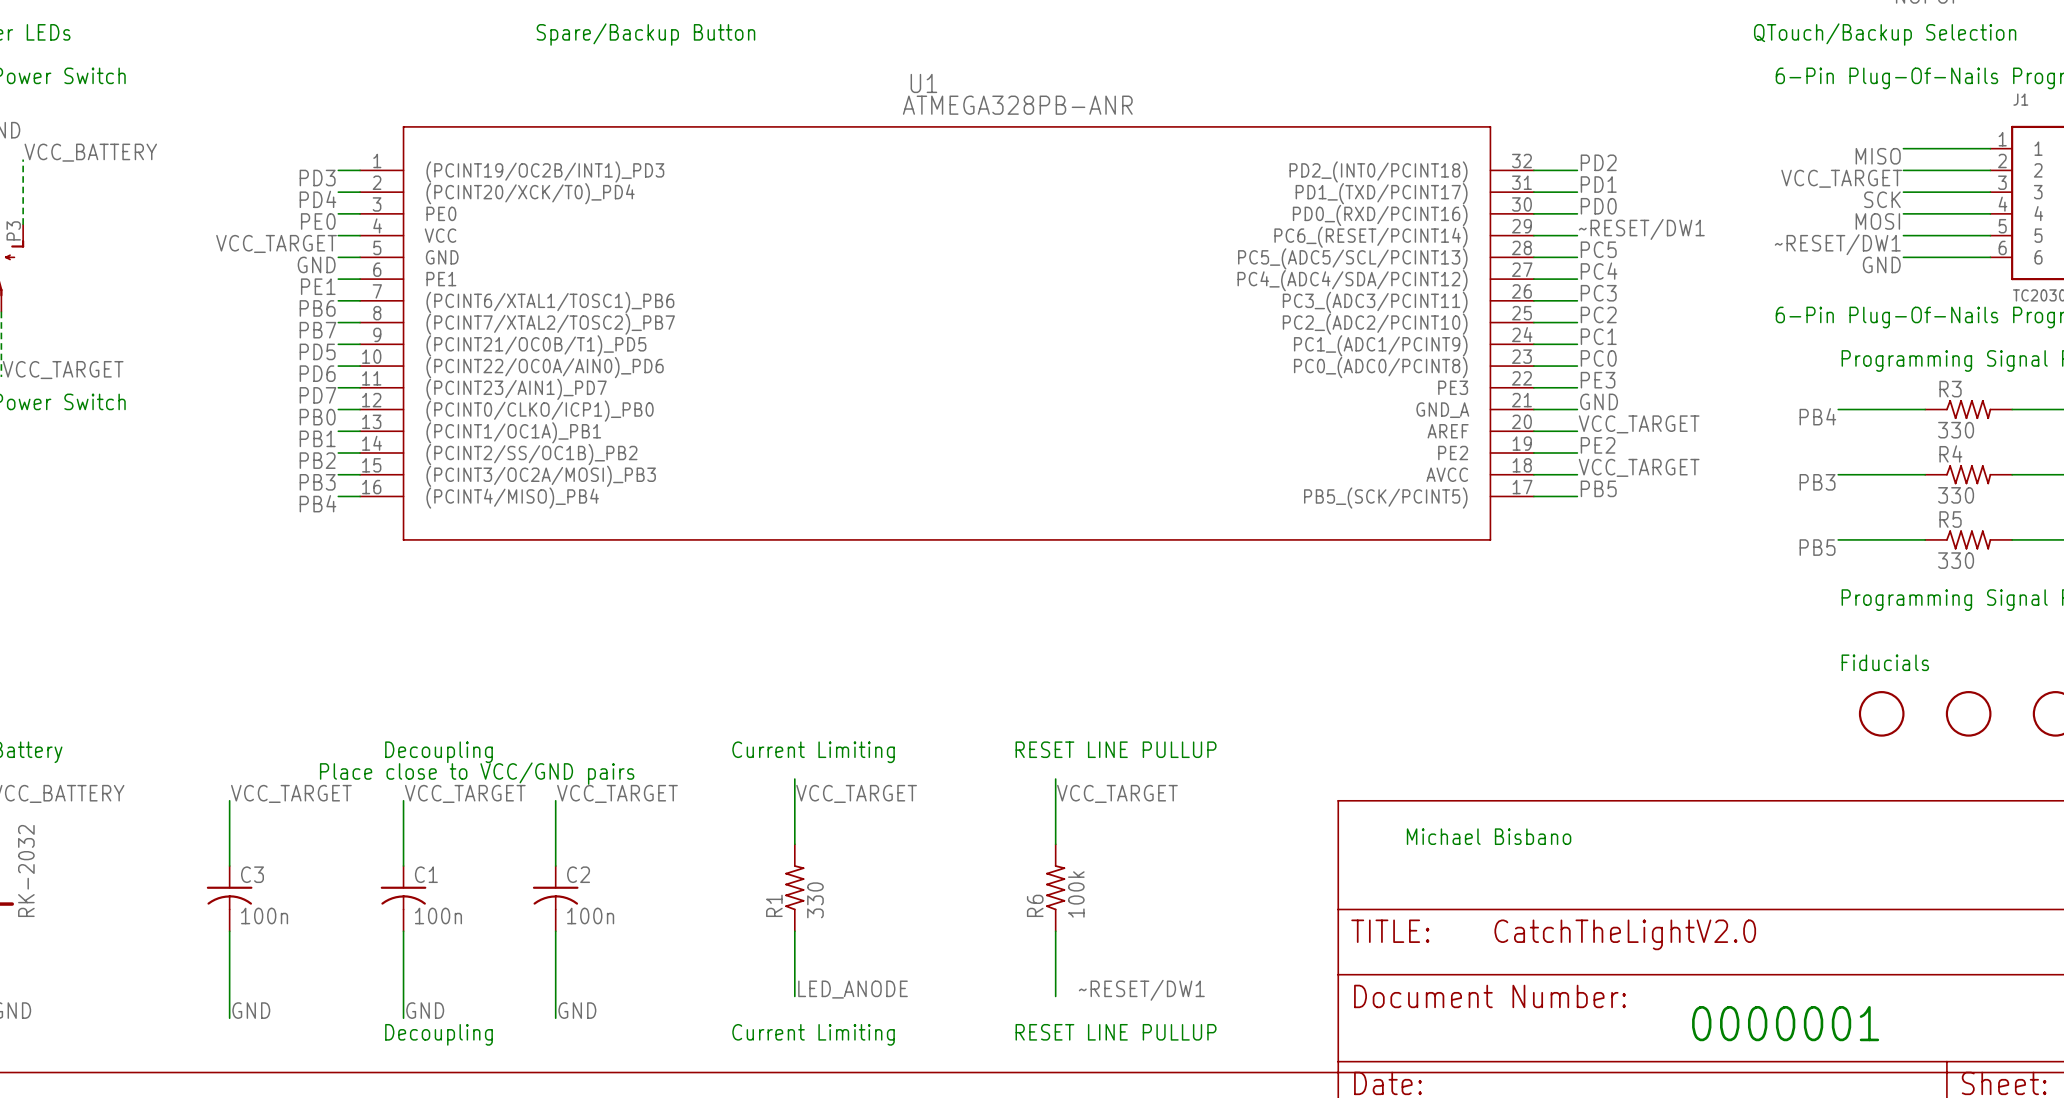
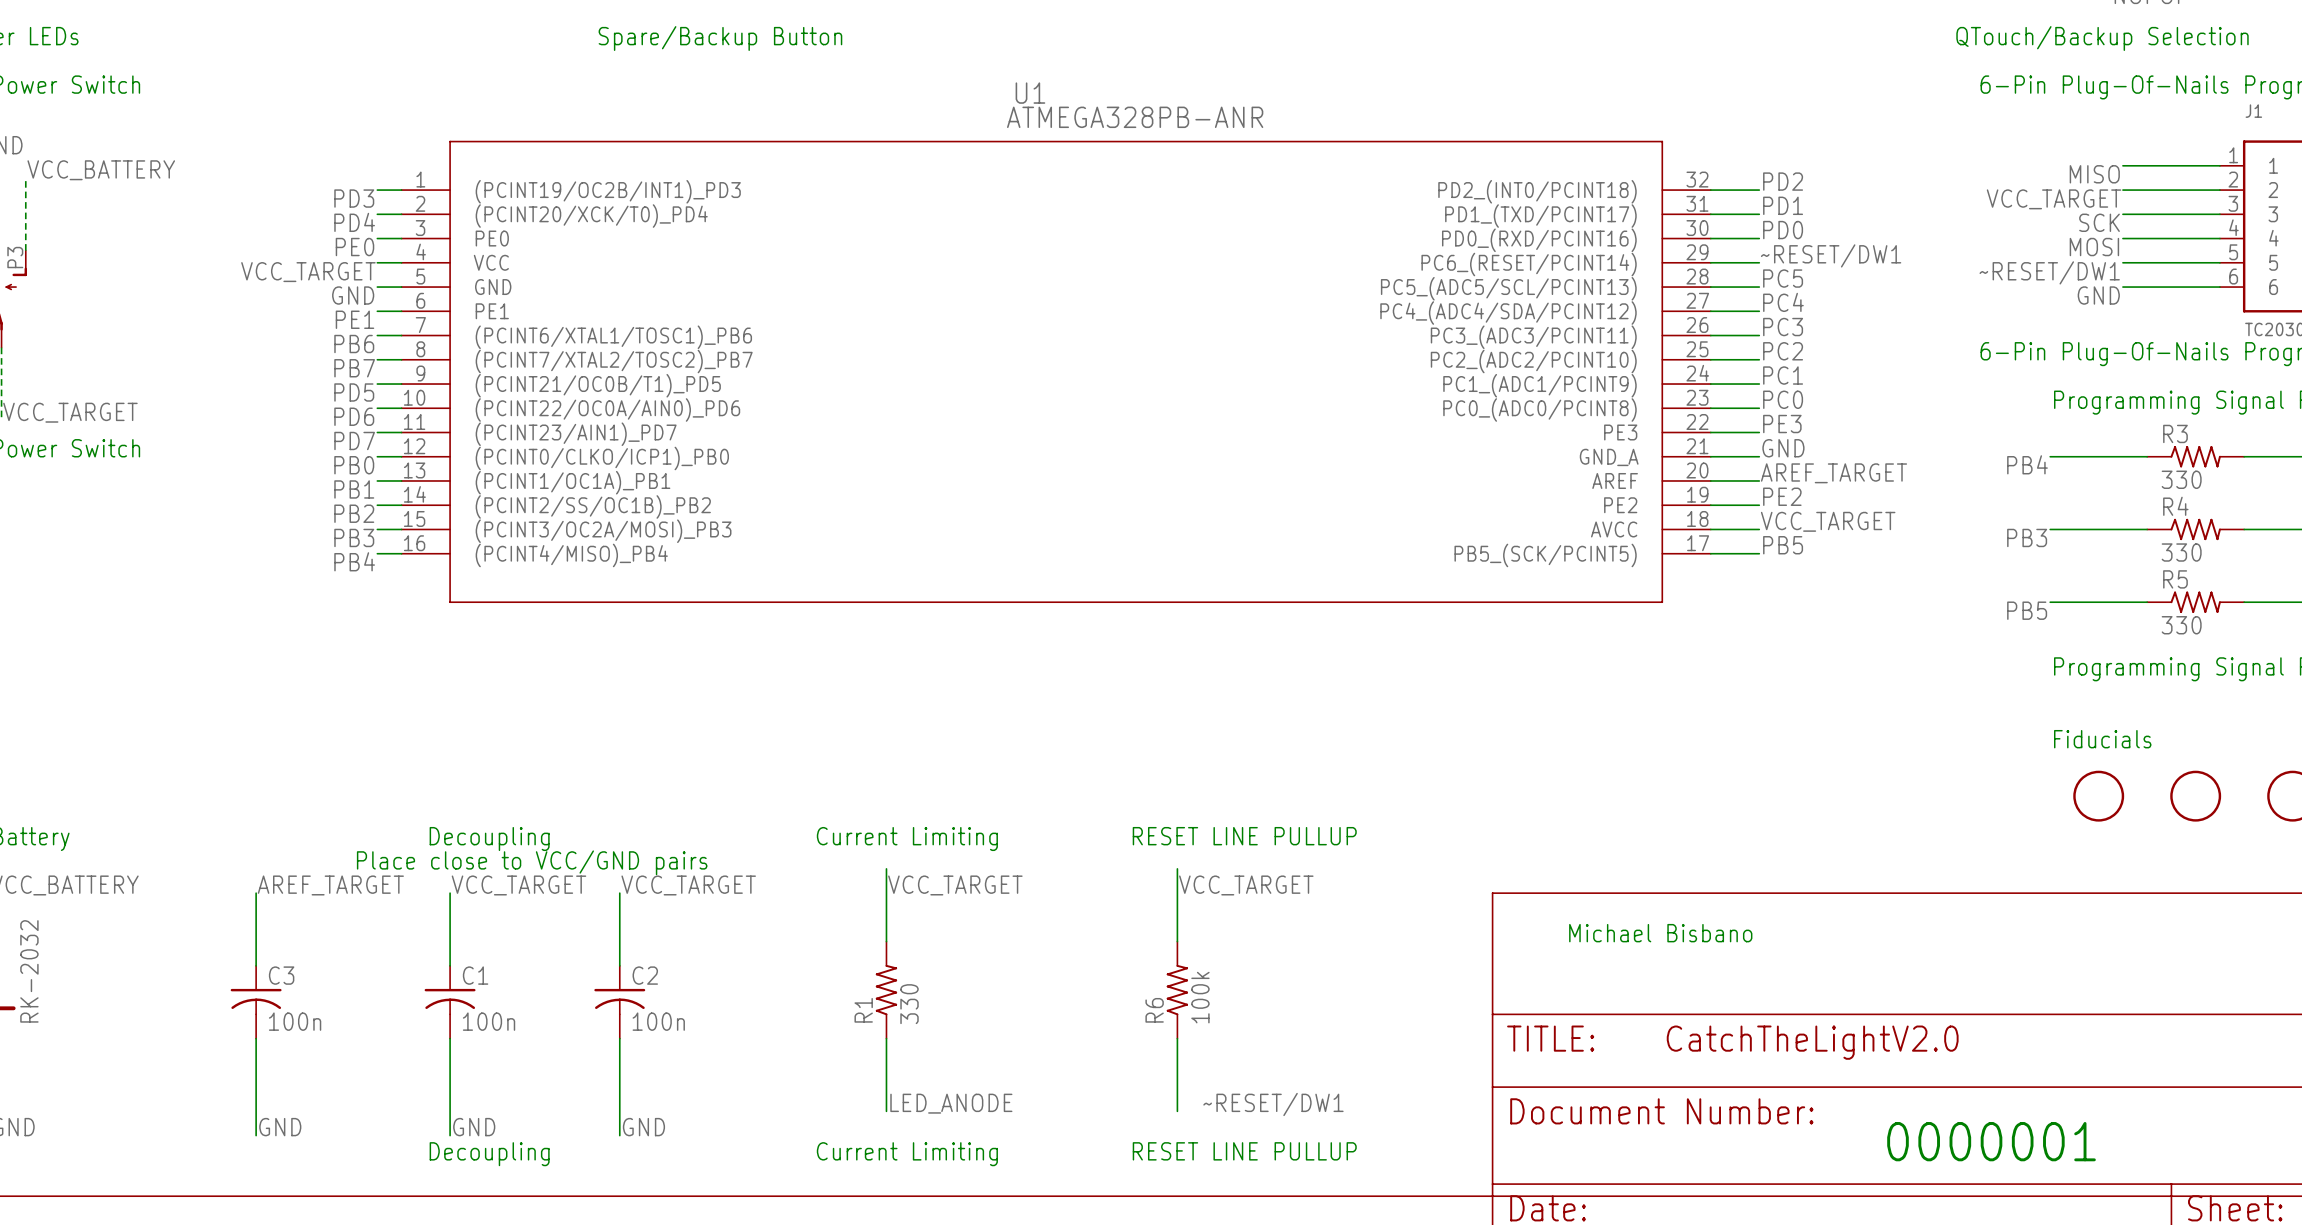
label: VCC_TARGET (1639, 424) -> AREF_TARGET (1833, 473)
label: VCC_TARGET (291, 793) -> AREF_TARGET (330, 885)

